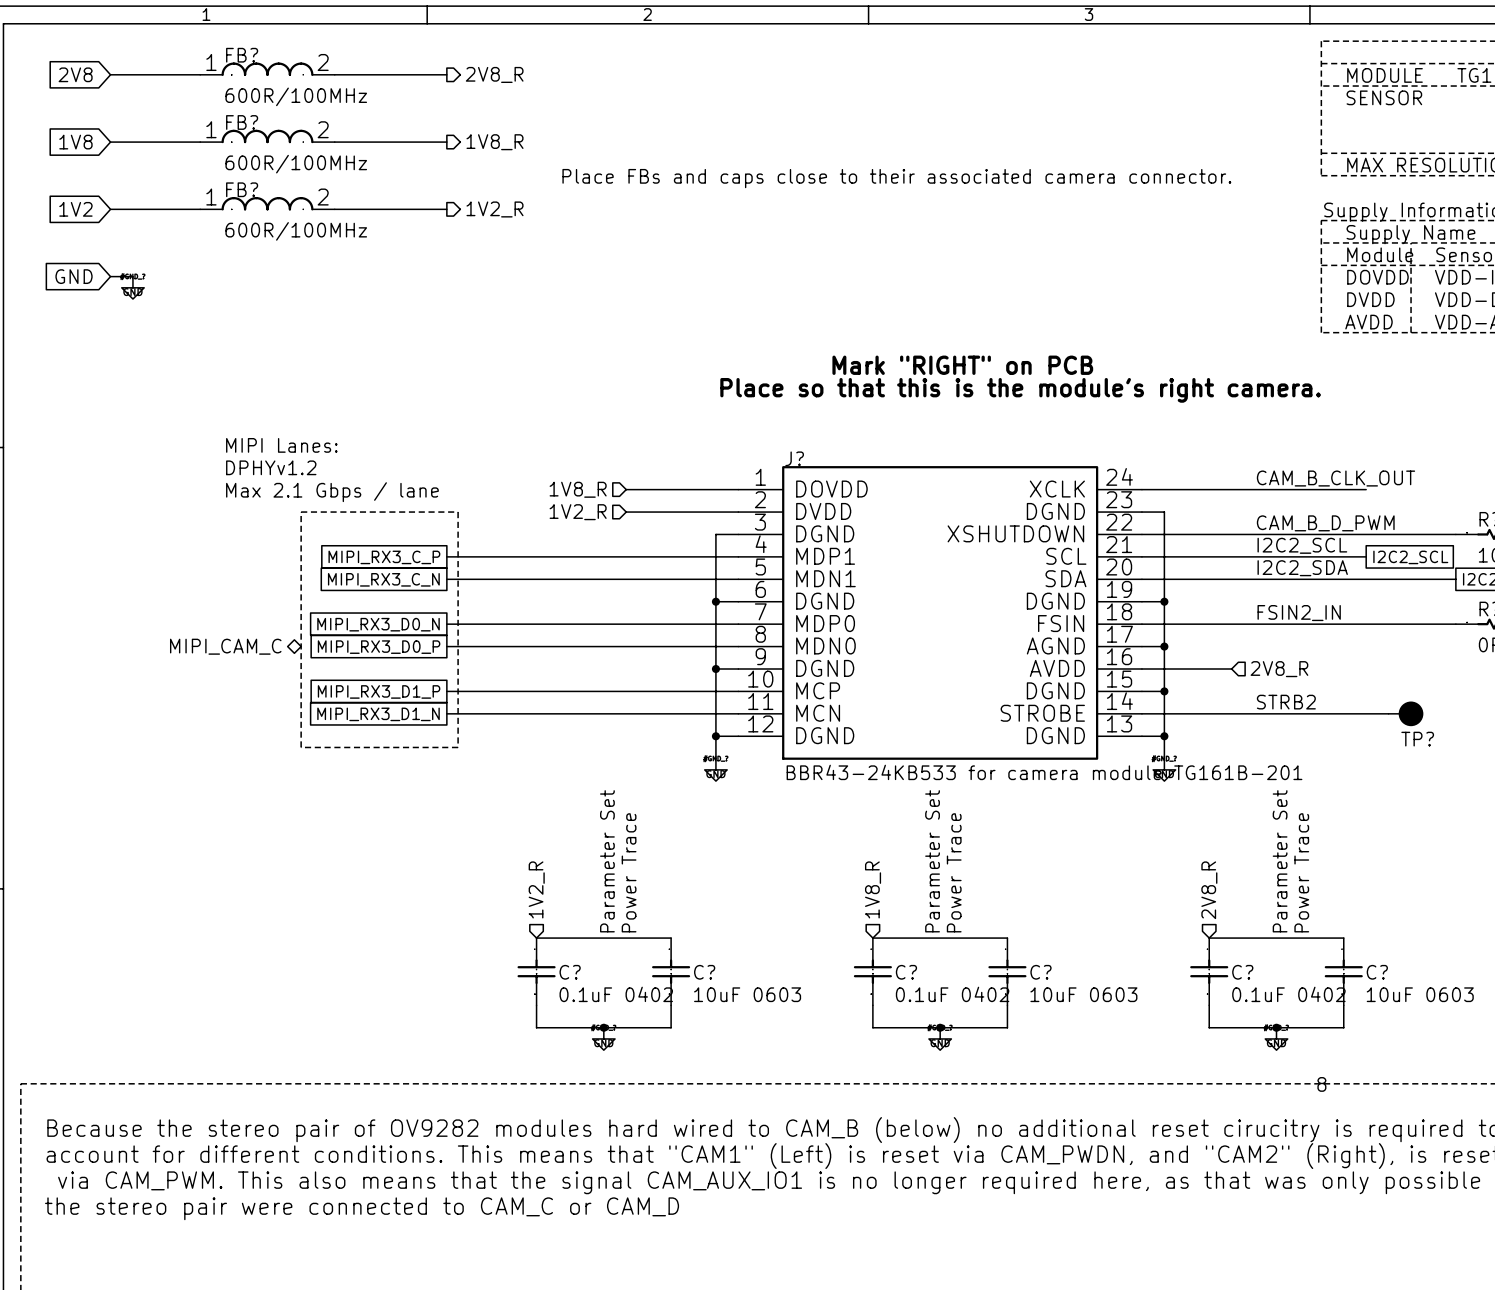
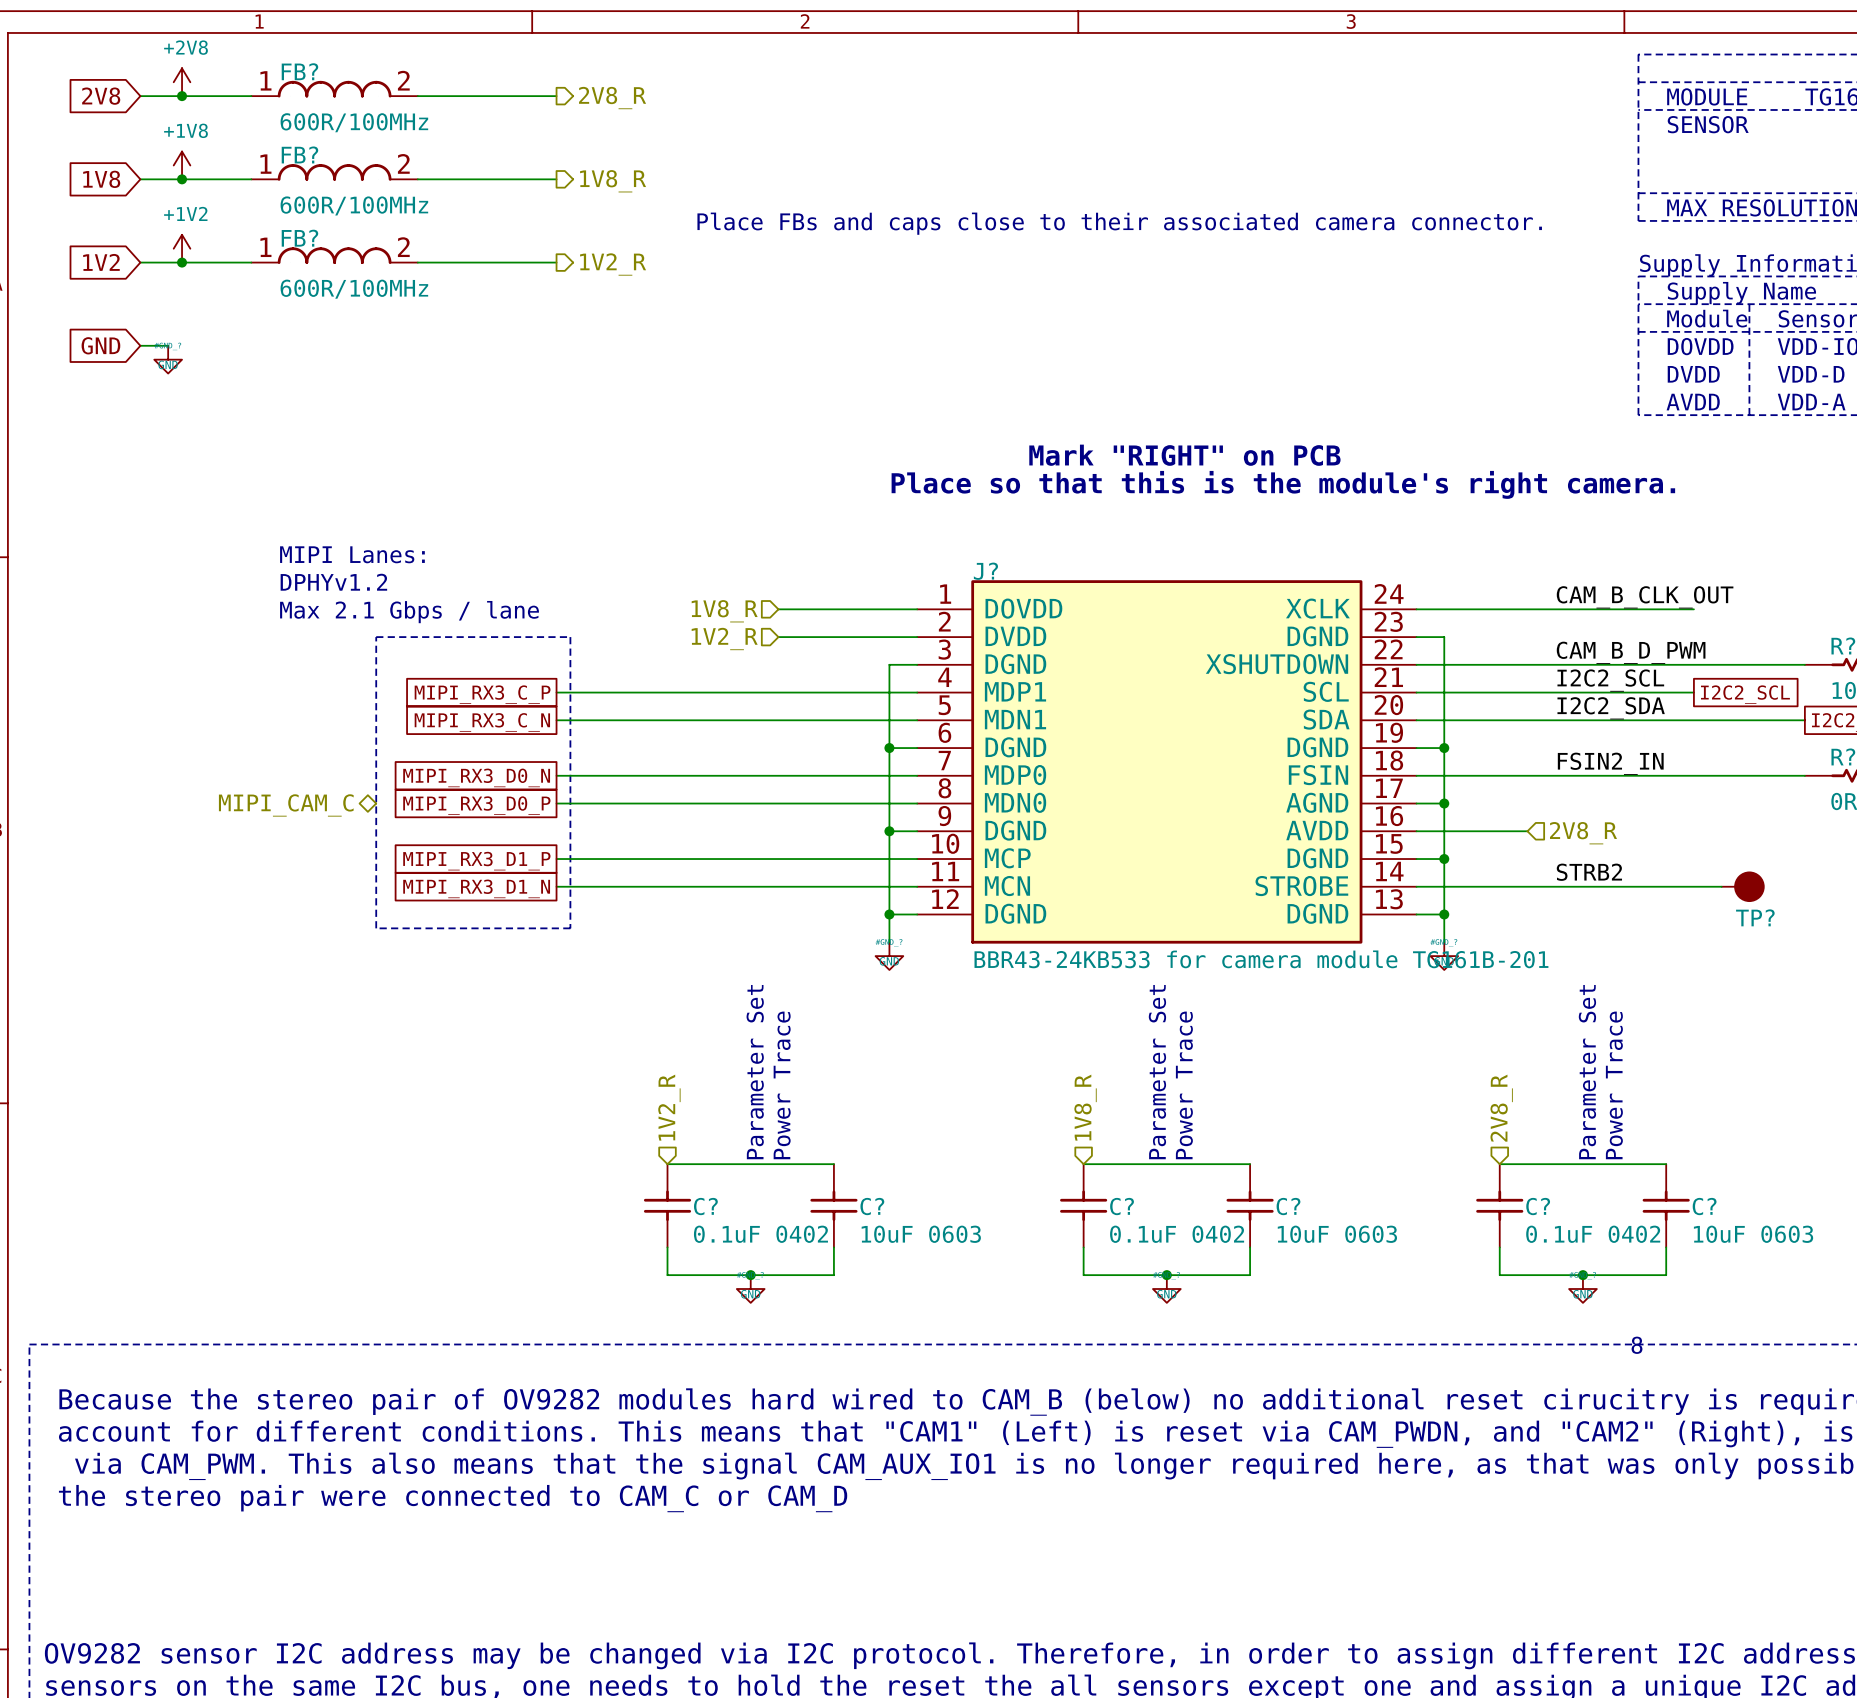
power symbol: none -> +2V8 (182, 82)
junction: none -> (182, 96)
power symbol: none -> +1V8 (182, 165)
junction: none -> (182, 179)
power symbol: none -> +1V2 (182, 248)
junction: none -> (182, 262)

